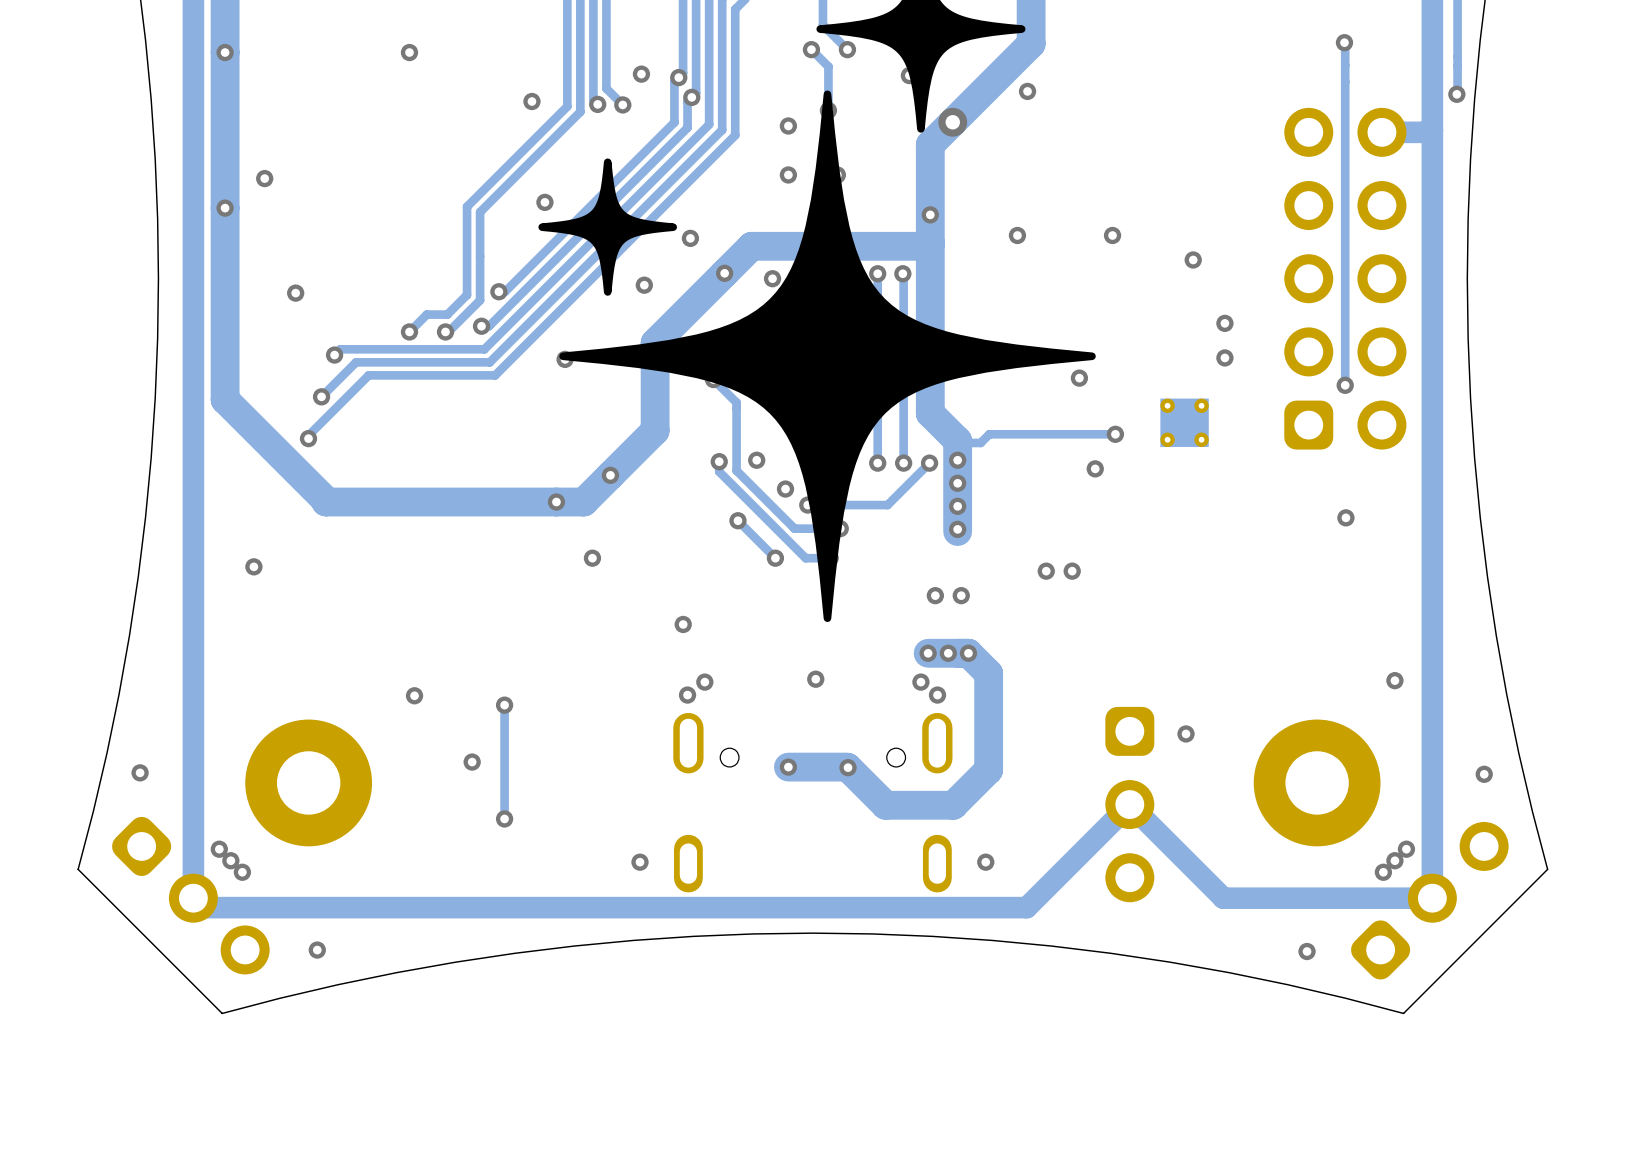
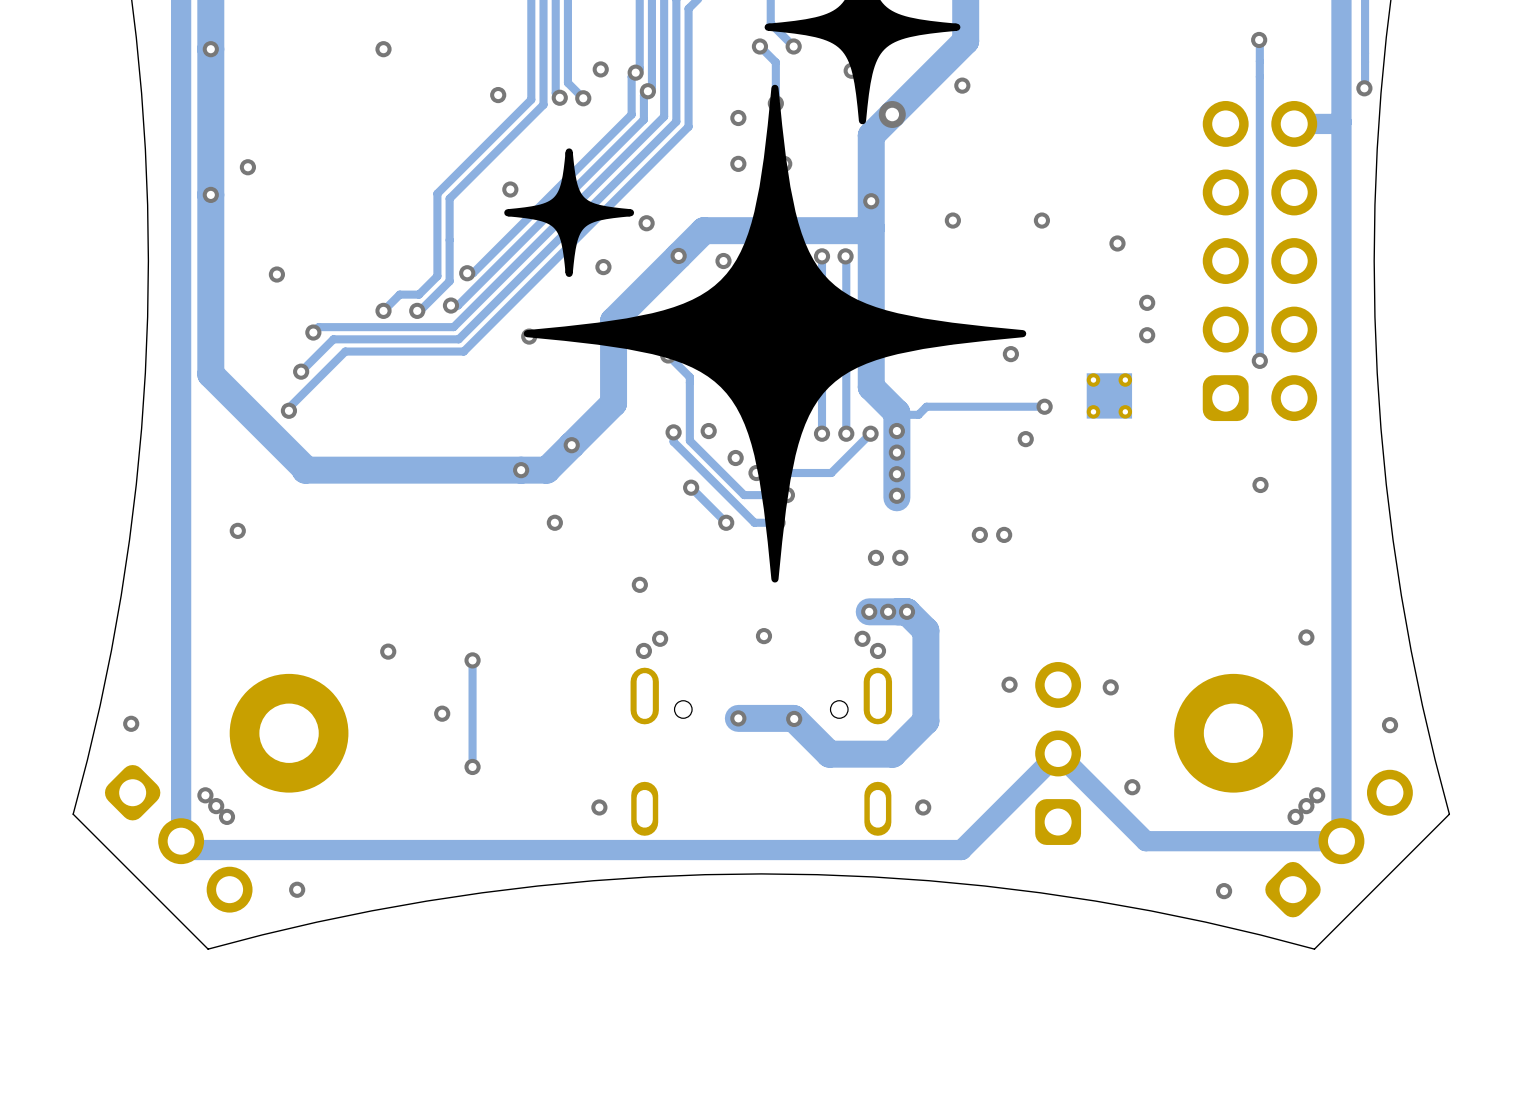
via: none -> (1009, 684)
part rotation: 0° (1129, 804) -> 180° (1058, 753)
via: none -> (1132, 787)

